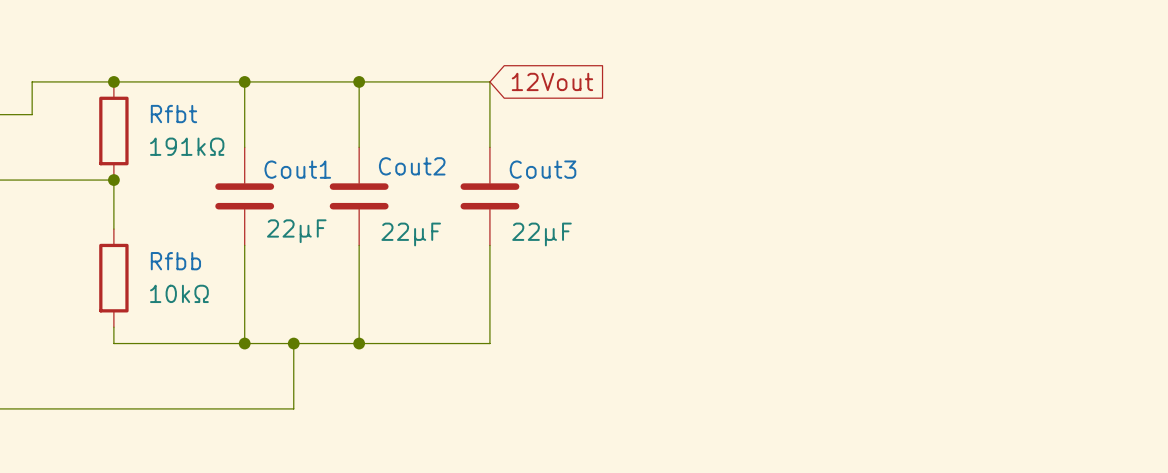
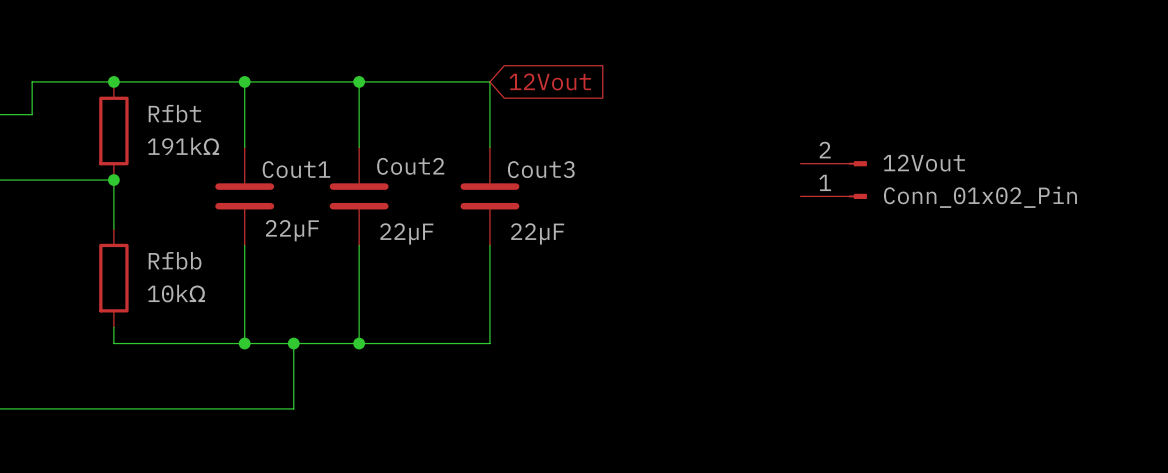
12Vout: none -> Conn_01x02_Pin (833, 180)

